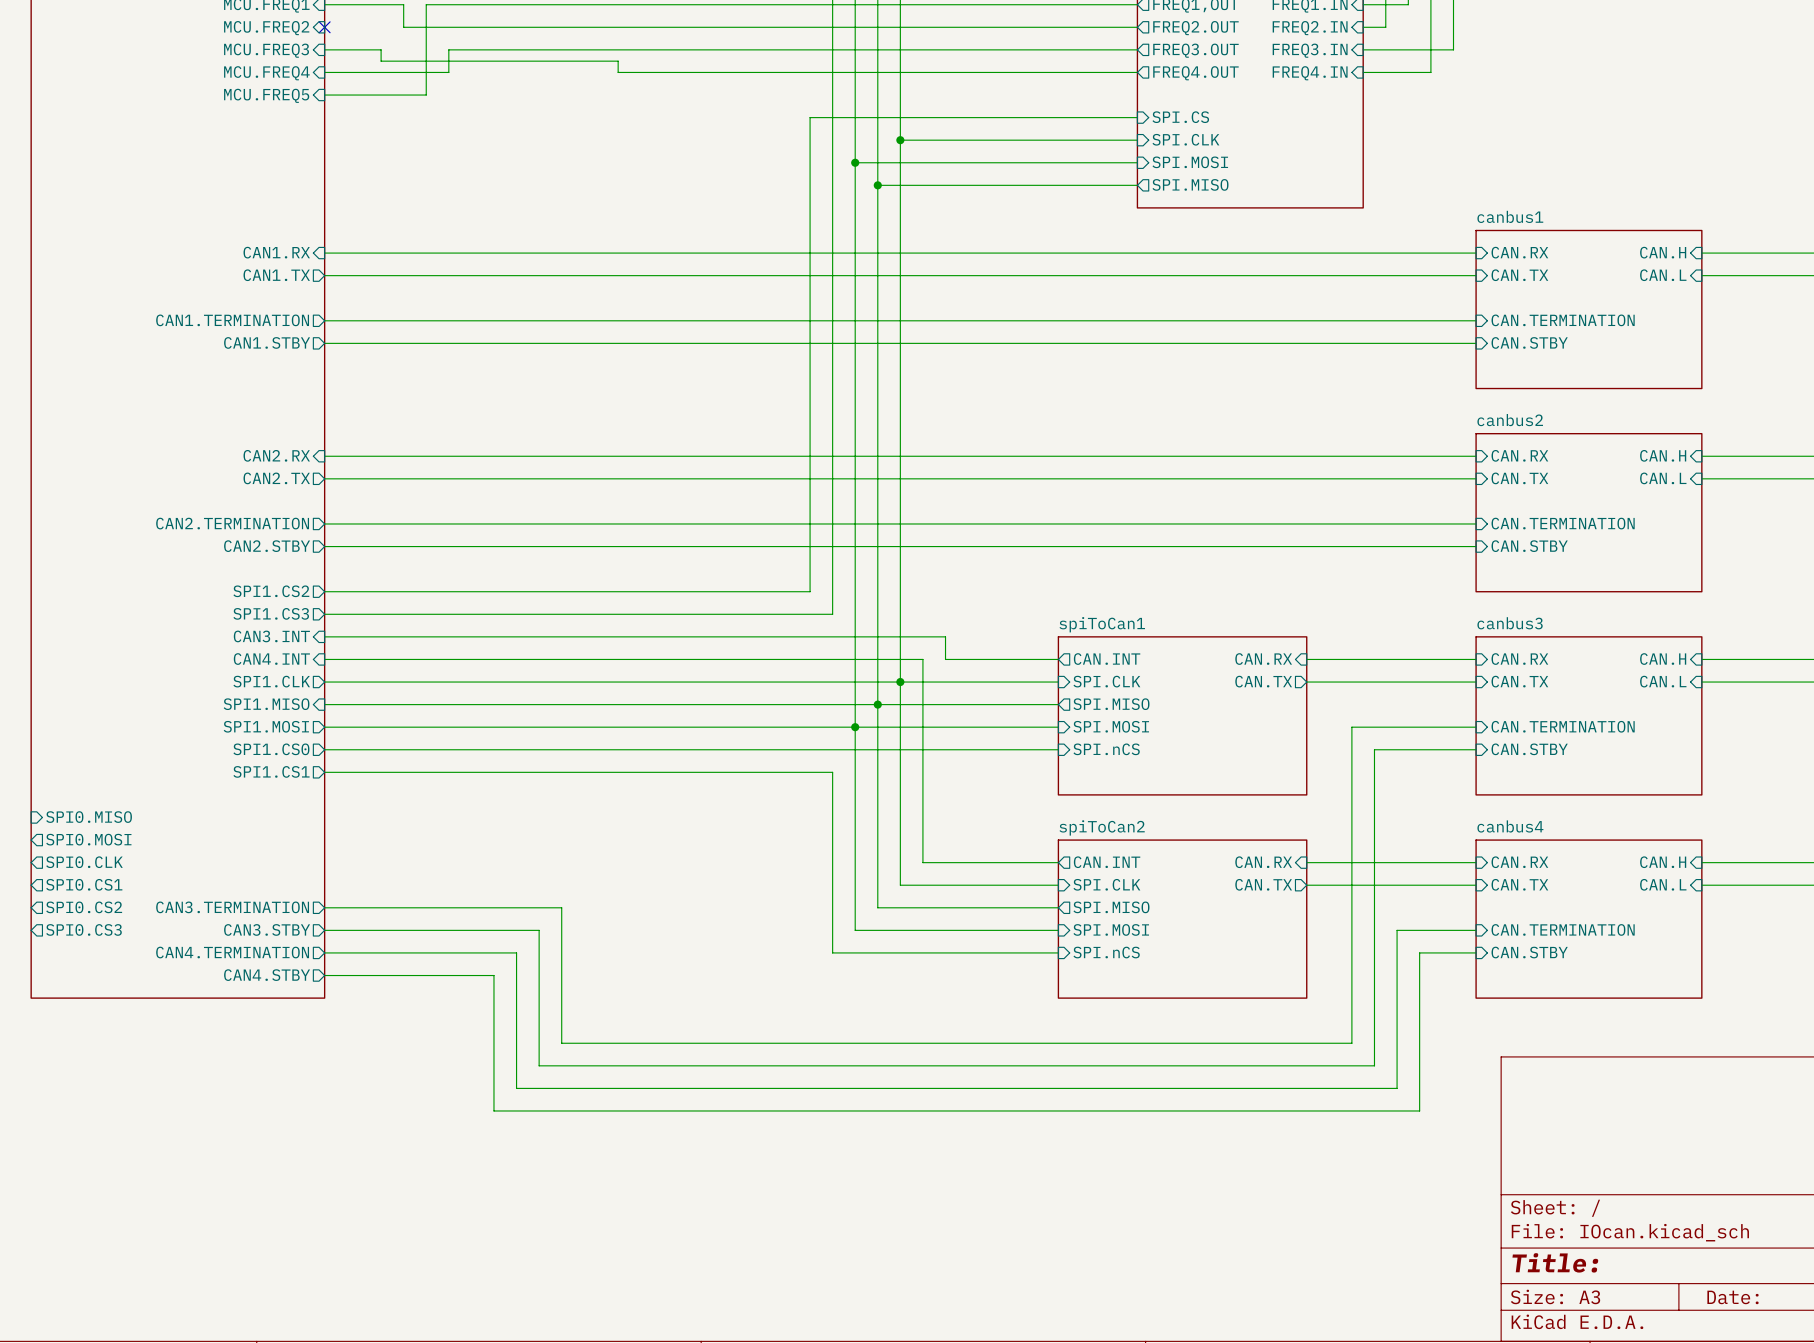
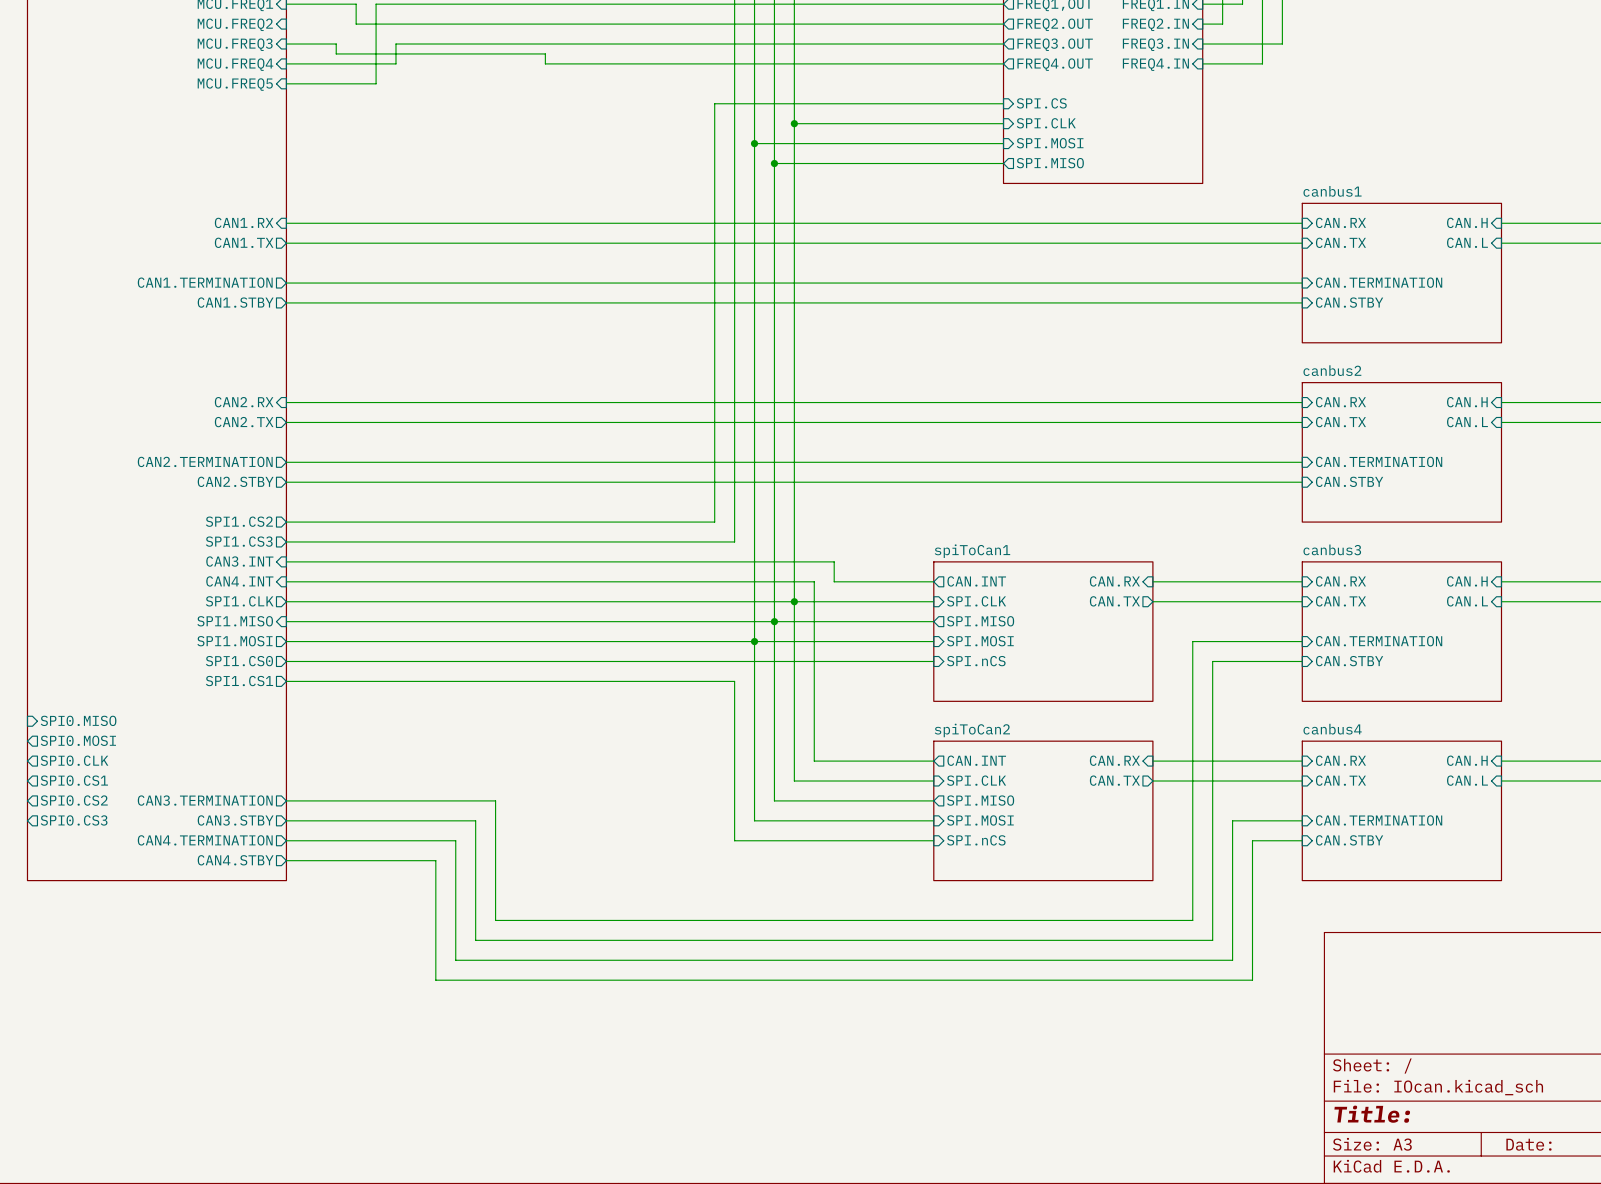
no-connect mark: (324, 27) -> none

